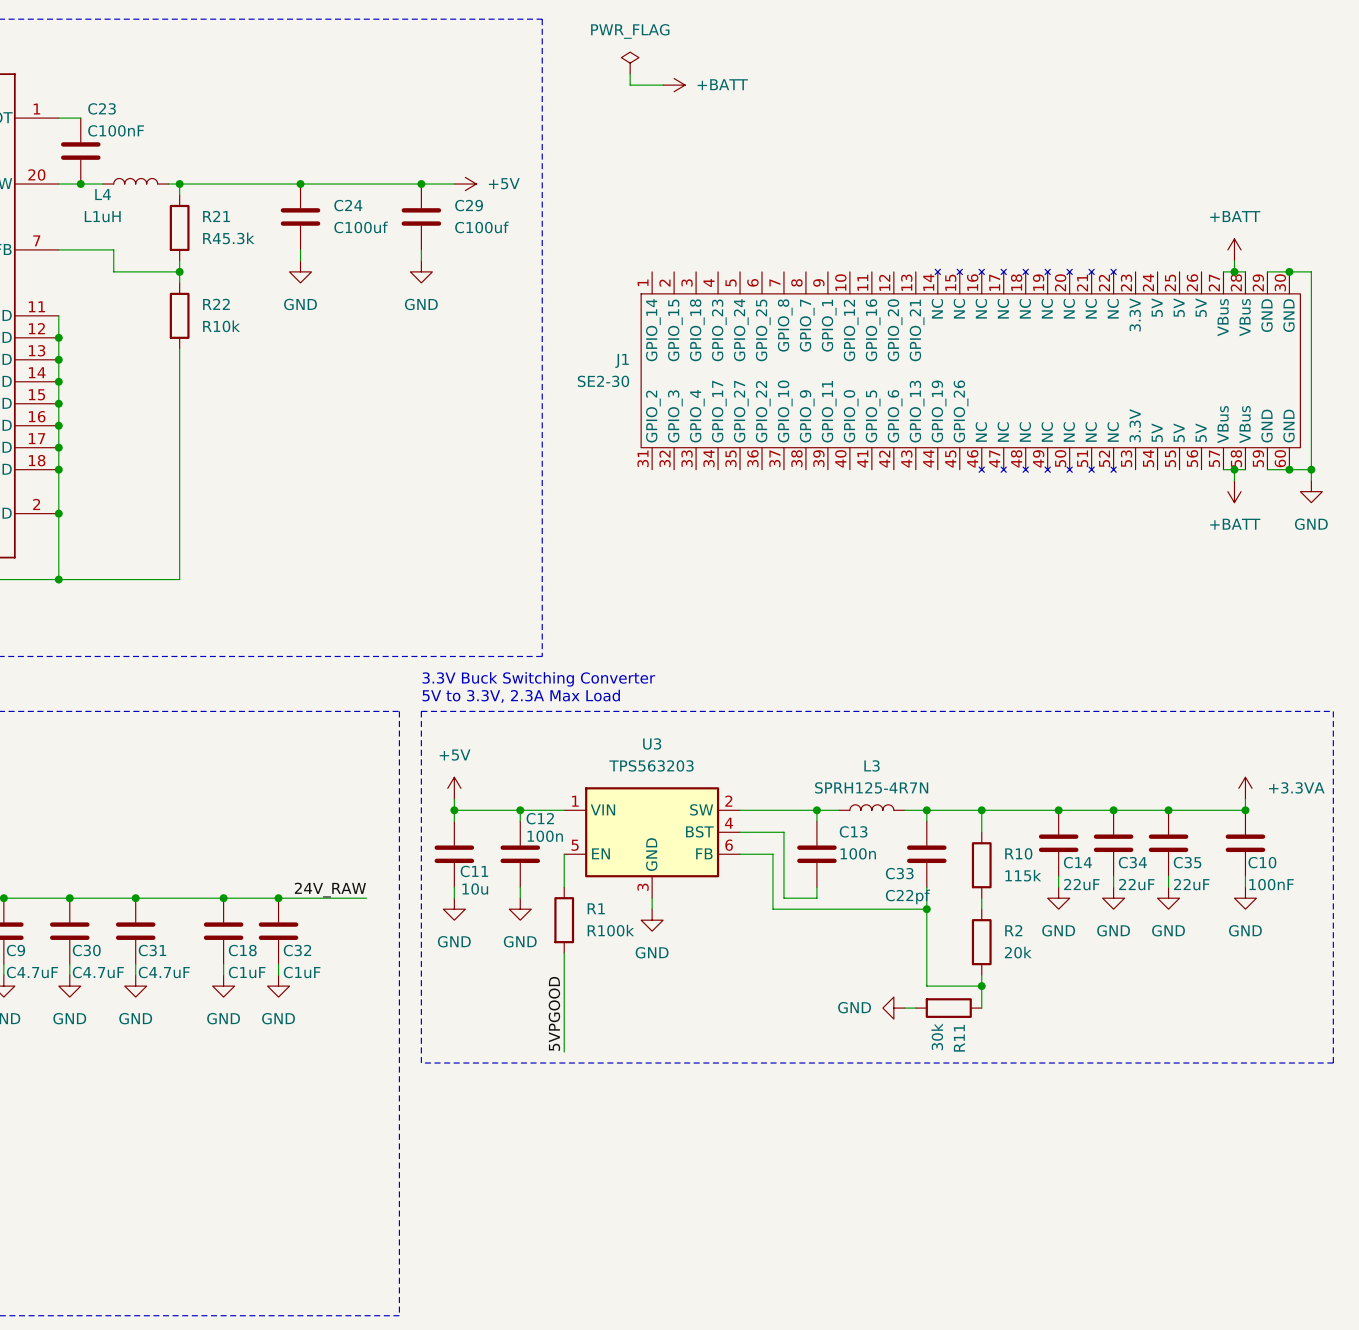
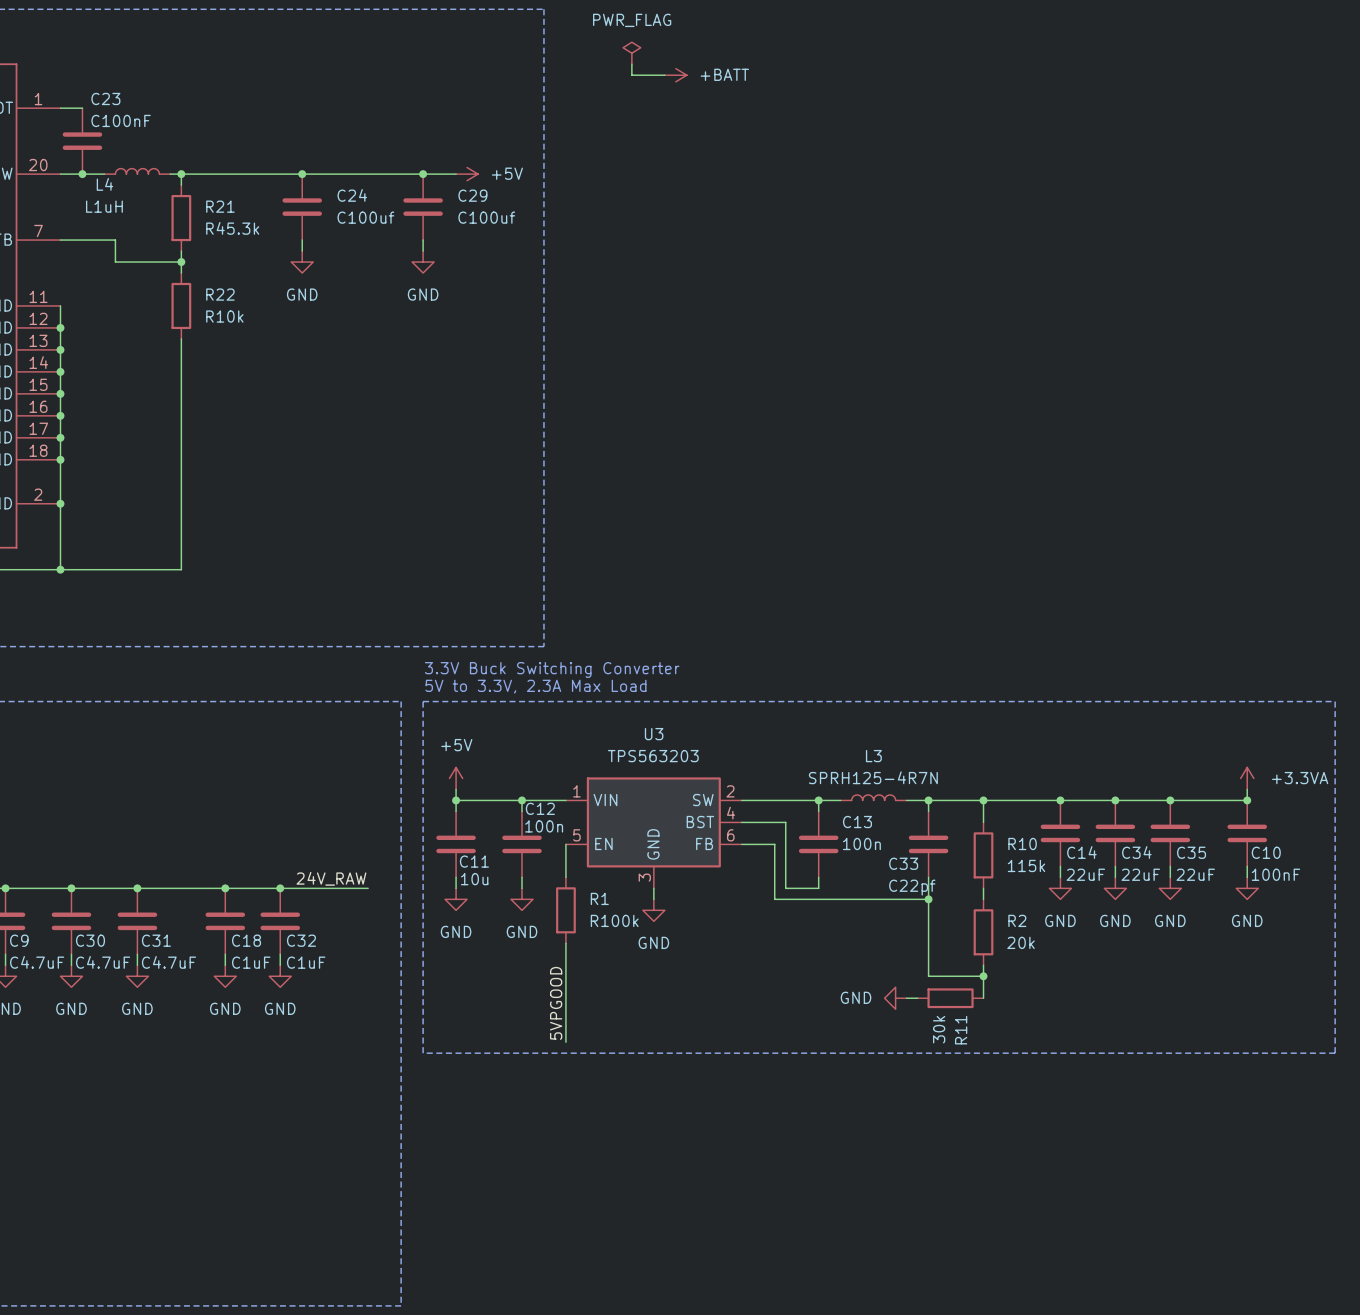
power symbol: +BATT (1234, 249) -> none
wire: (1234, 260) (1234, 271) -> none
wire: (1223, 271) (1245, 271) -> none
junction: (1234, 271) -> none
wire: (1267, 271) (1311, 271) (1311, 480) -> none
junction: (1289, 271) -> none
J1: SE2-30 (970, 370) -> none
wire: (1223, 469) (1245, 469) -> none
wire: (1234, 469) (1234, 480) -> none
junction: (1234, 469) -> none
wire: (1267, 469) (1311, 469) -> none
junction: (1289, 469) -> none
junction: (1311, 469) -> none
power symbol: +BATT (1234, 491) -> none
power symbol: GND (1311, 491) -> none

